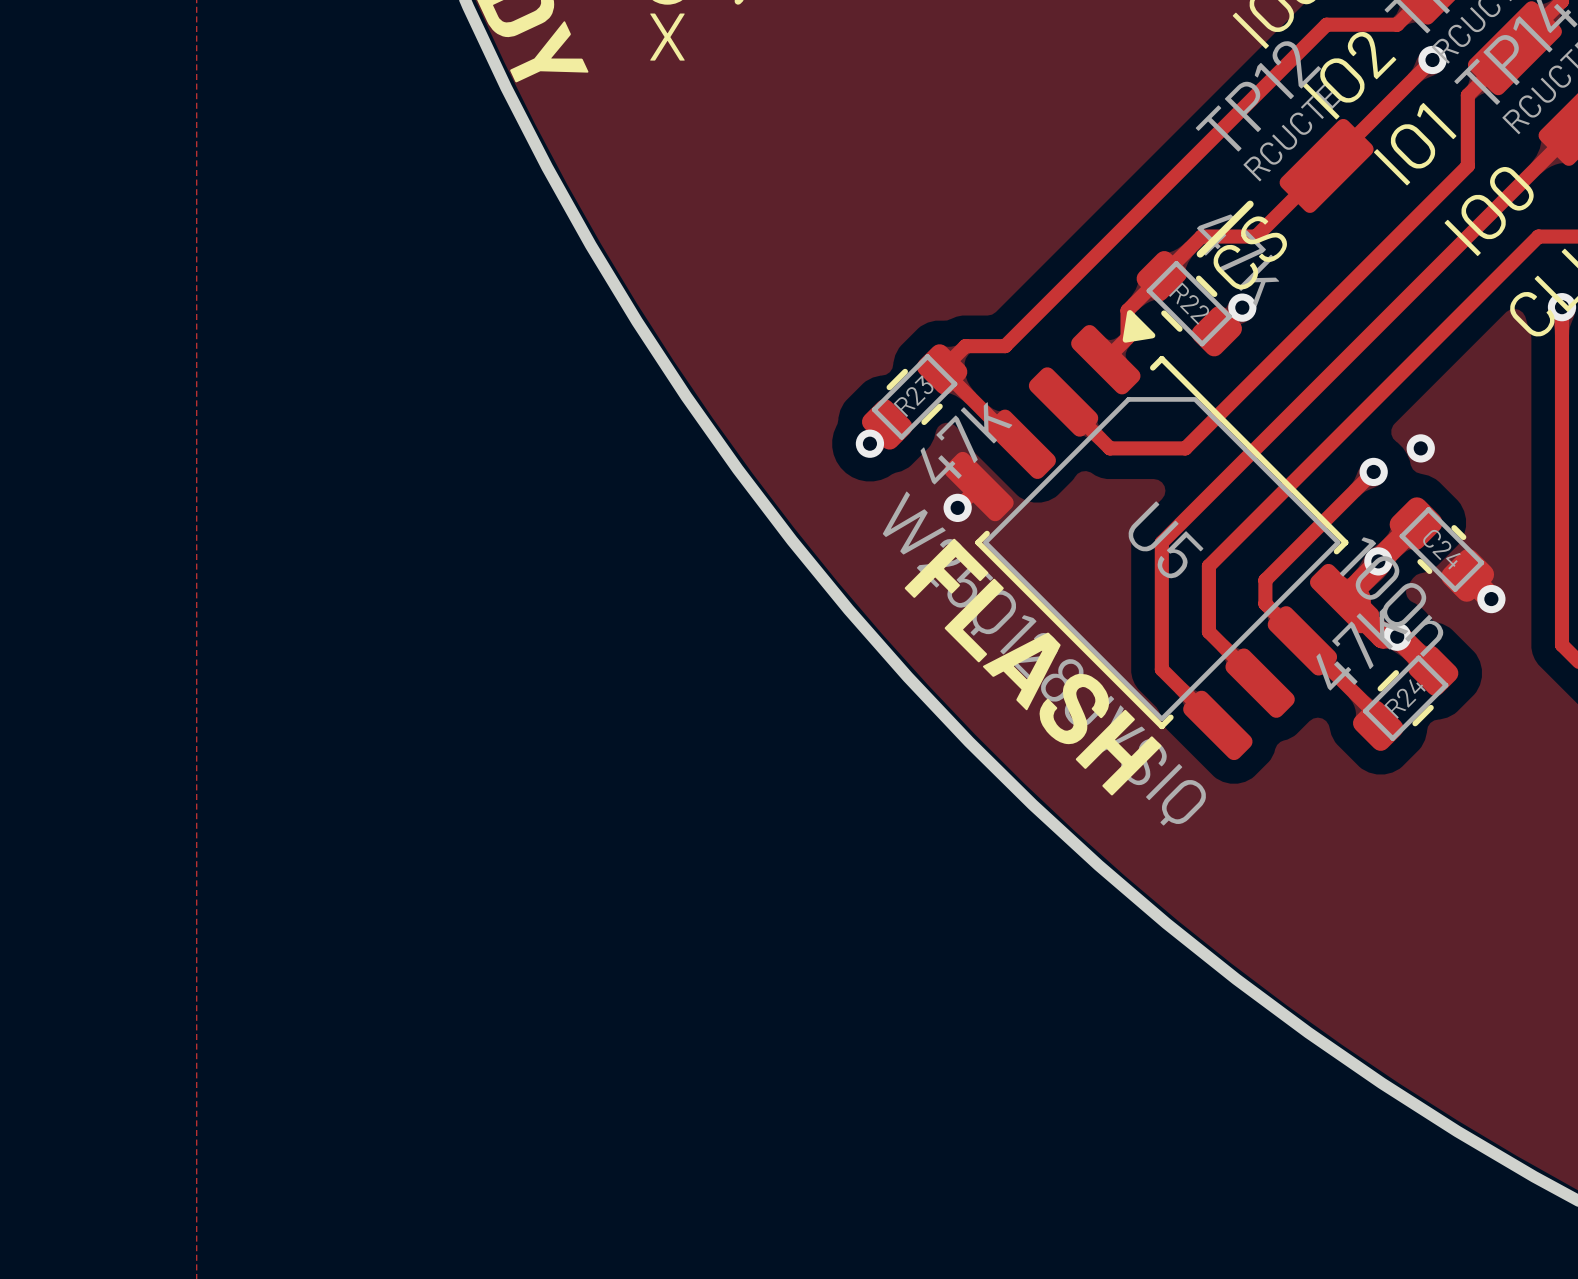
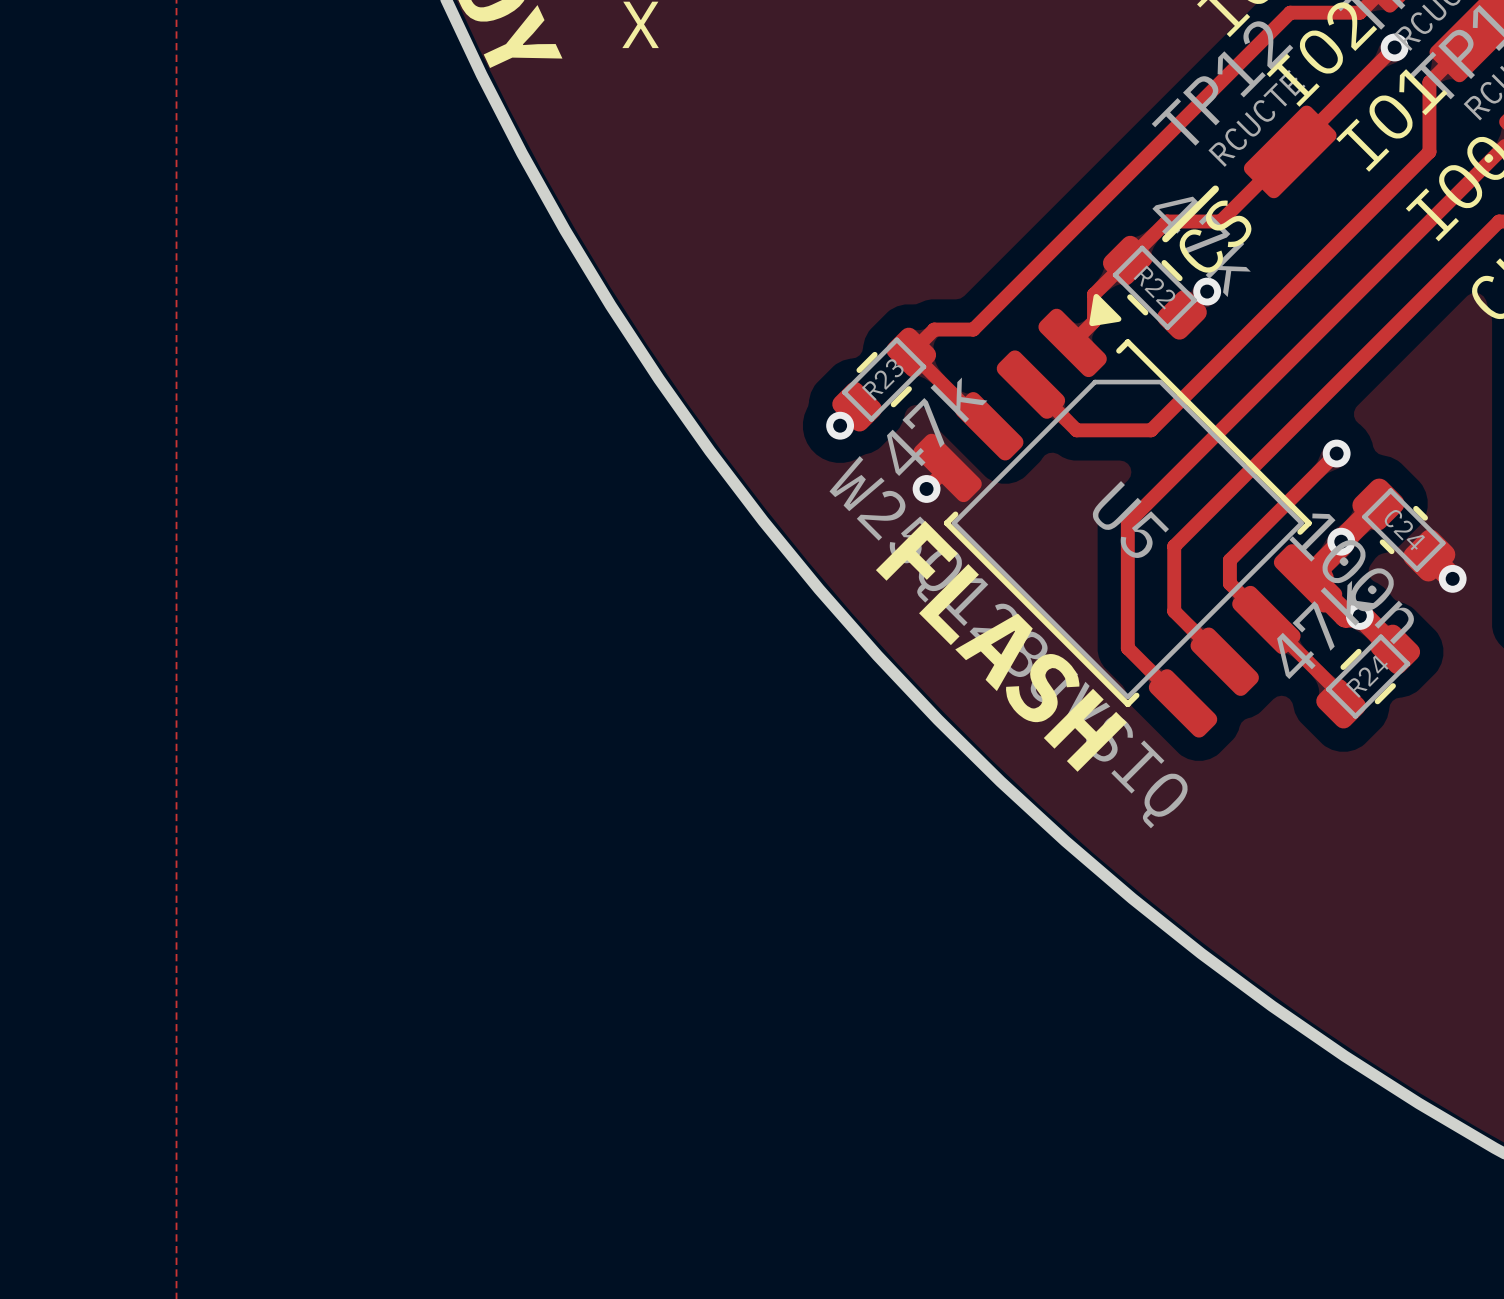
via: (1420, 448) -> none

